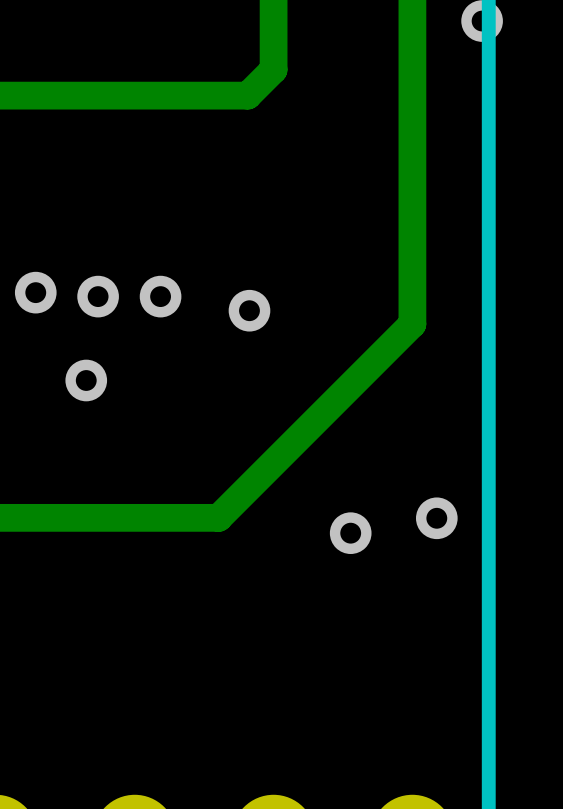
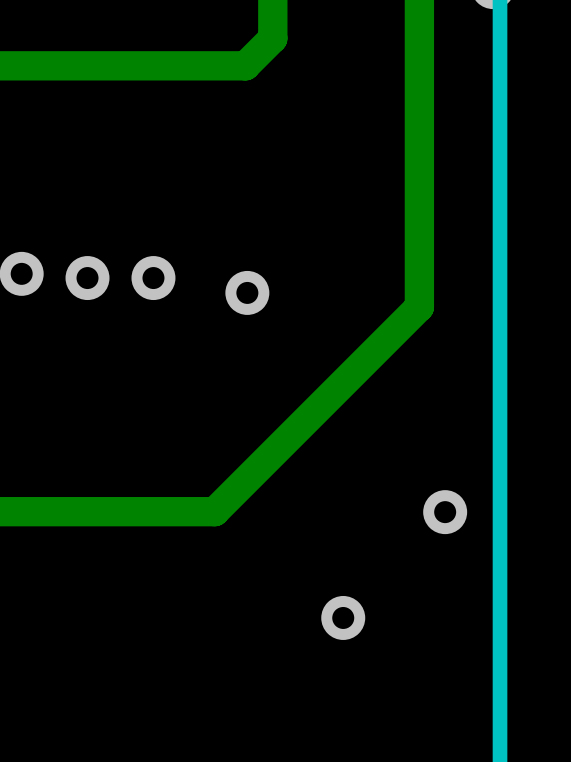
via: (86, 380) -> none
via position: (350, 533) -> (343, 617)

